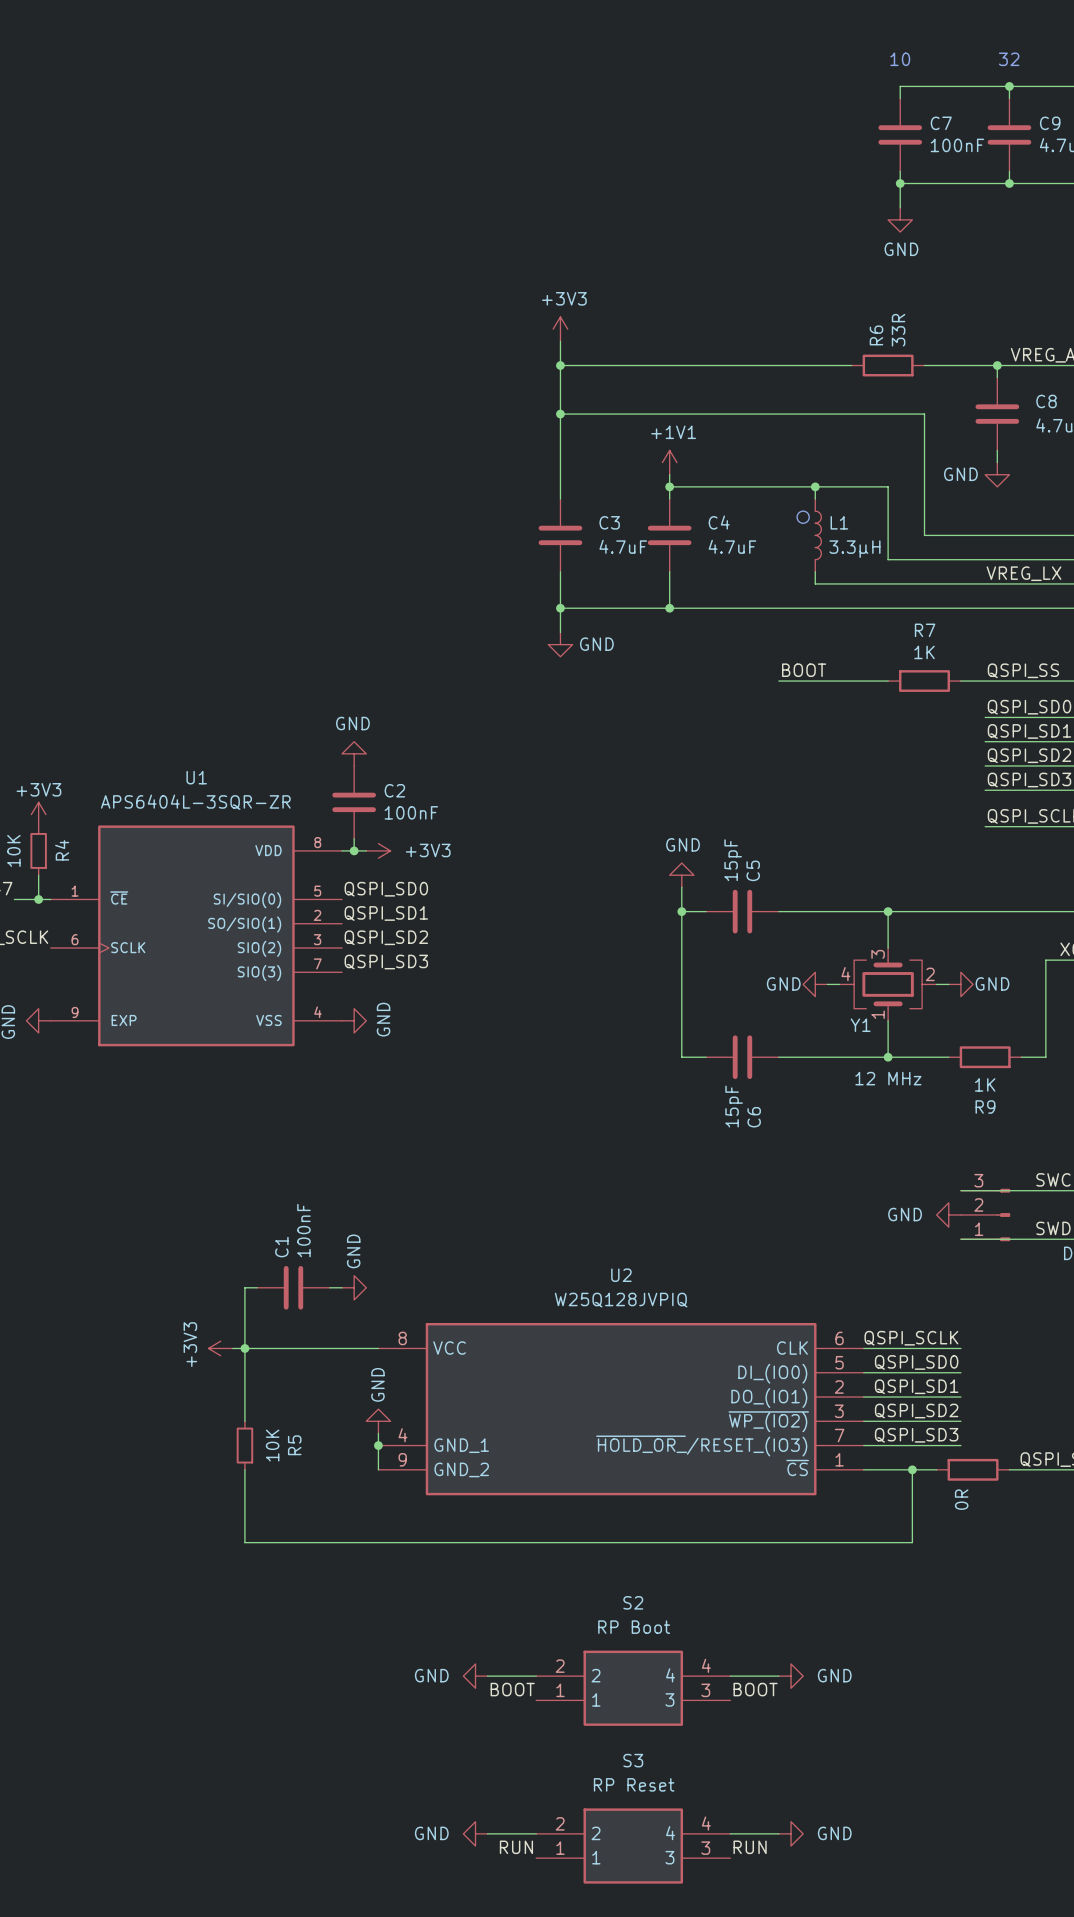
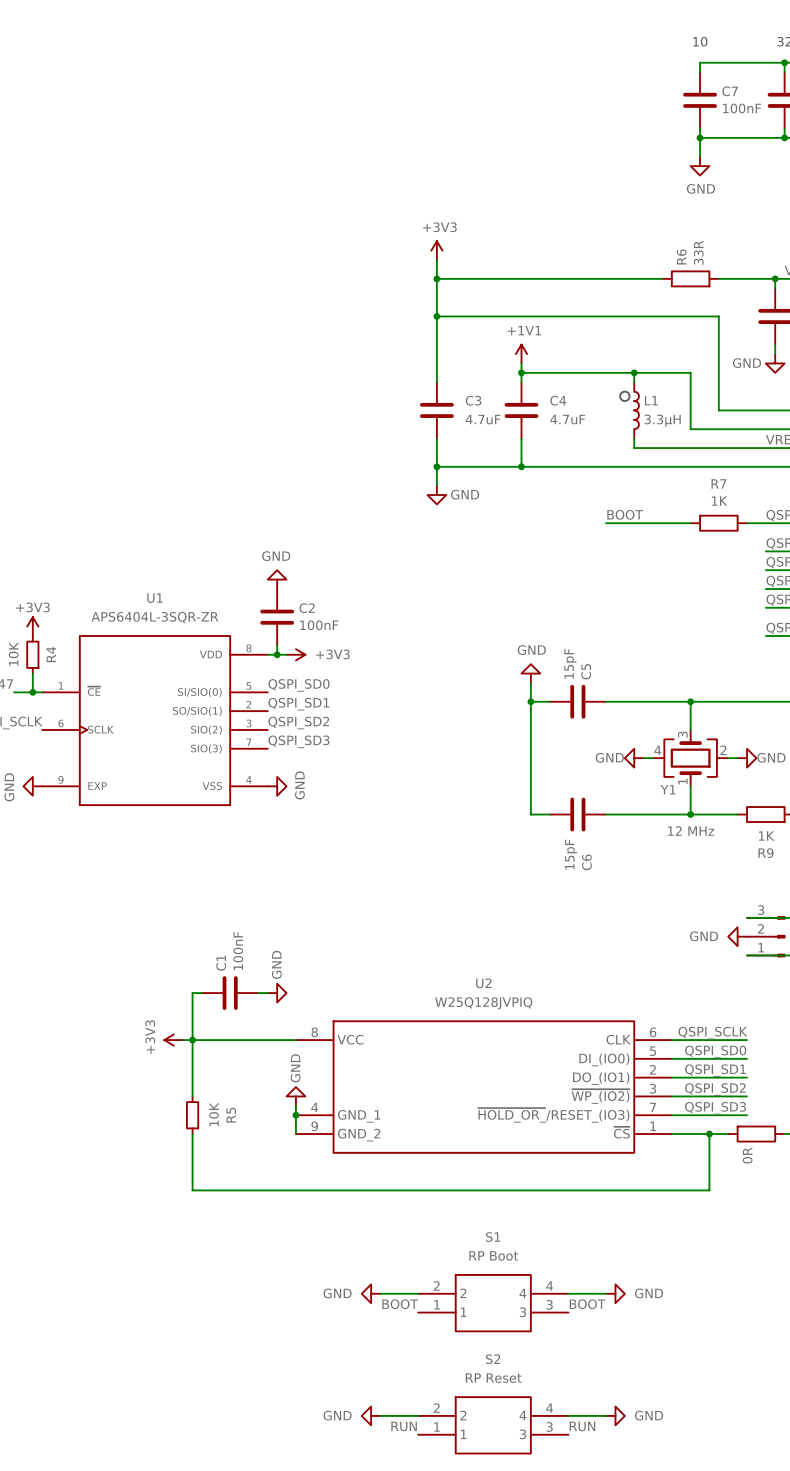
S2 name: S2 (633, 1602) -> S1 (493, 1237)
S3 name: S3 (633, 1760) -> S2 (493, 1359)

